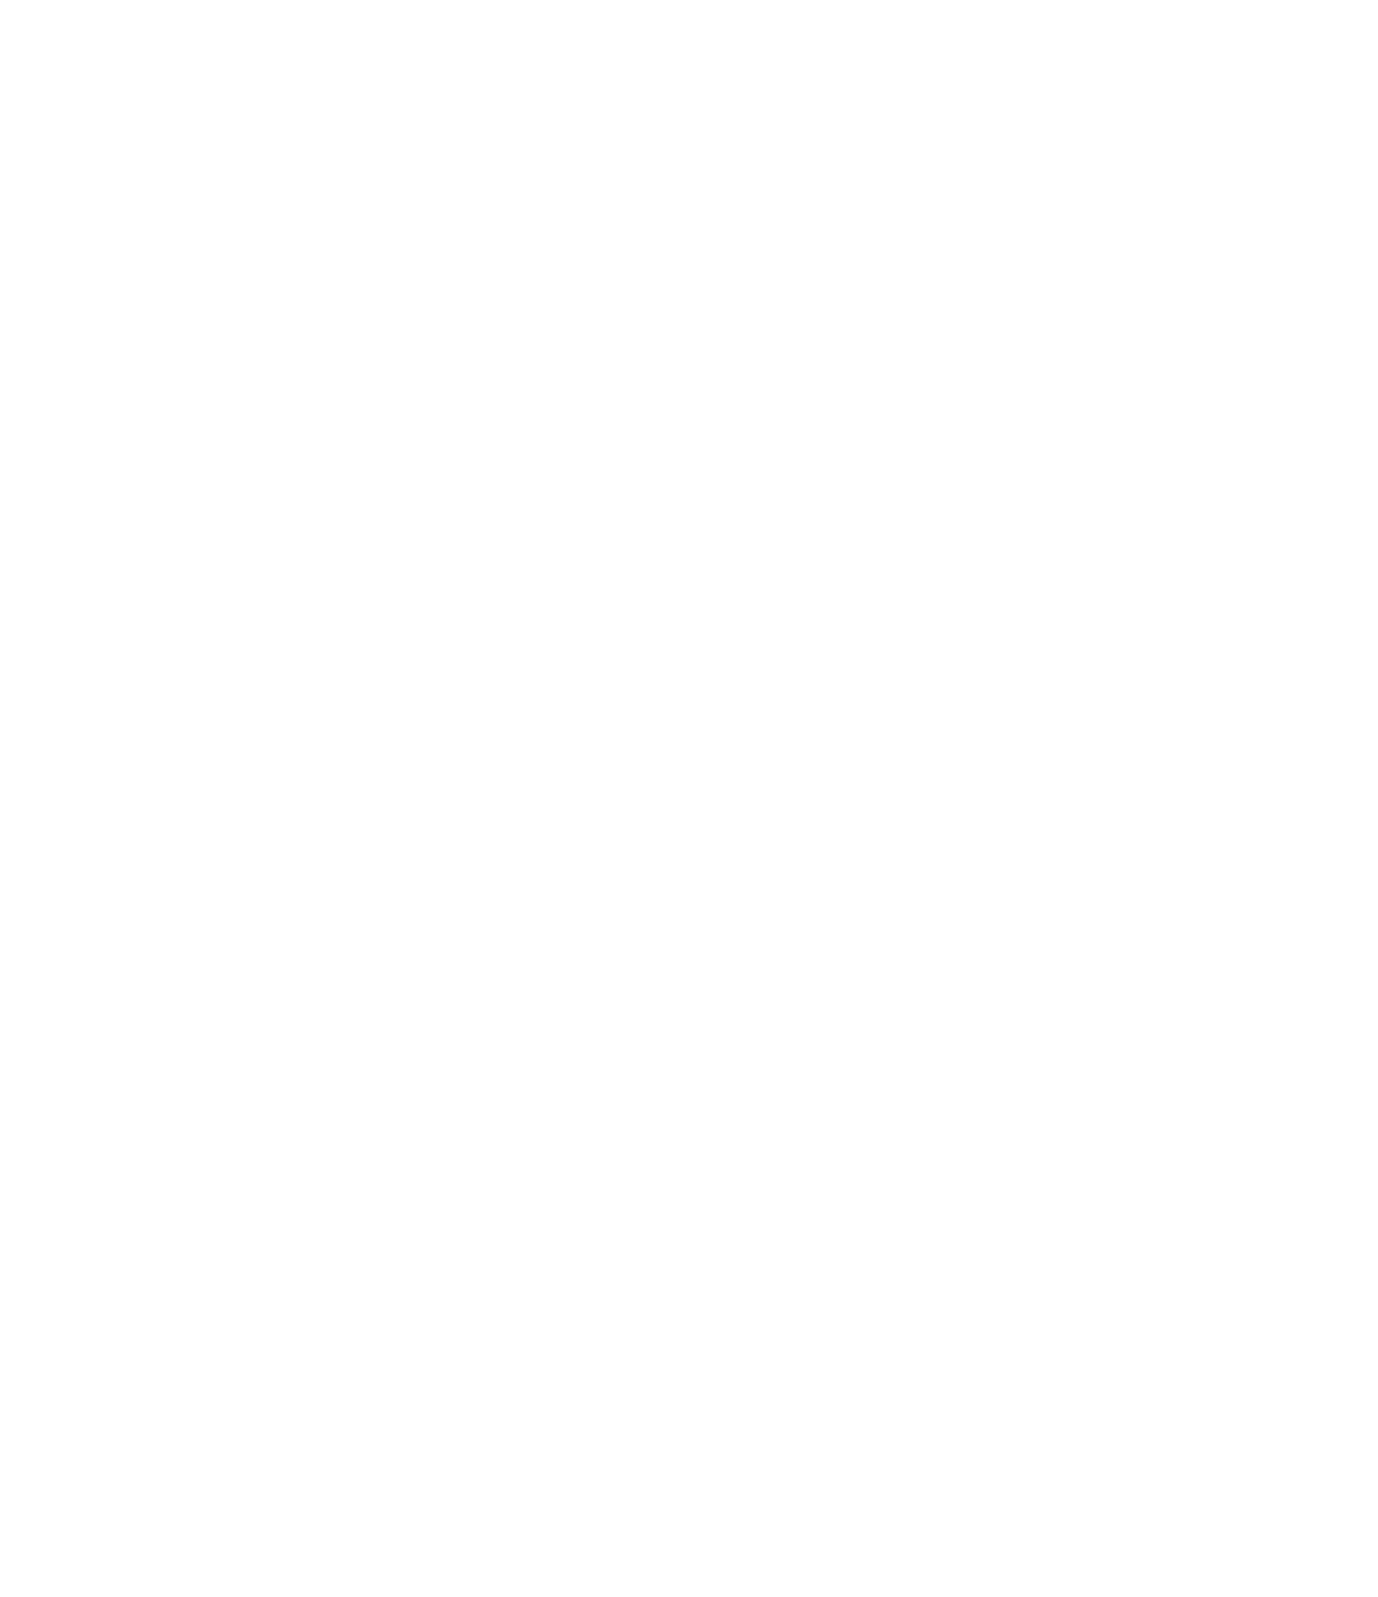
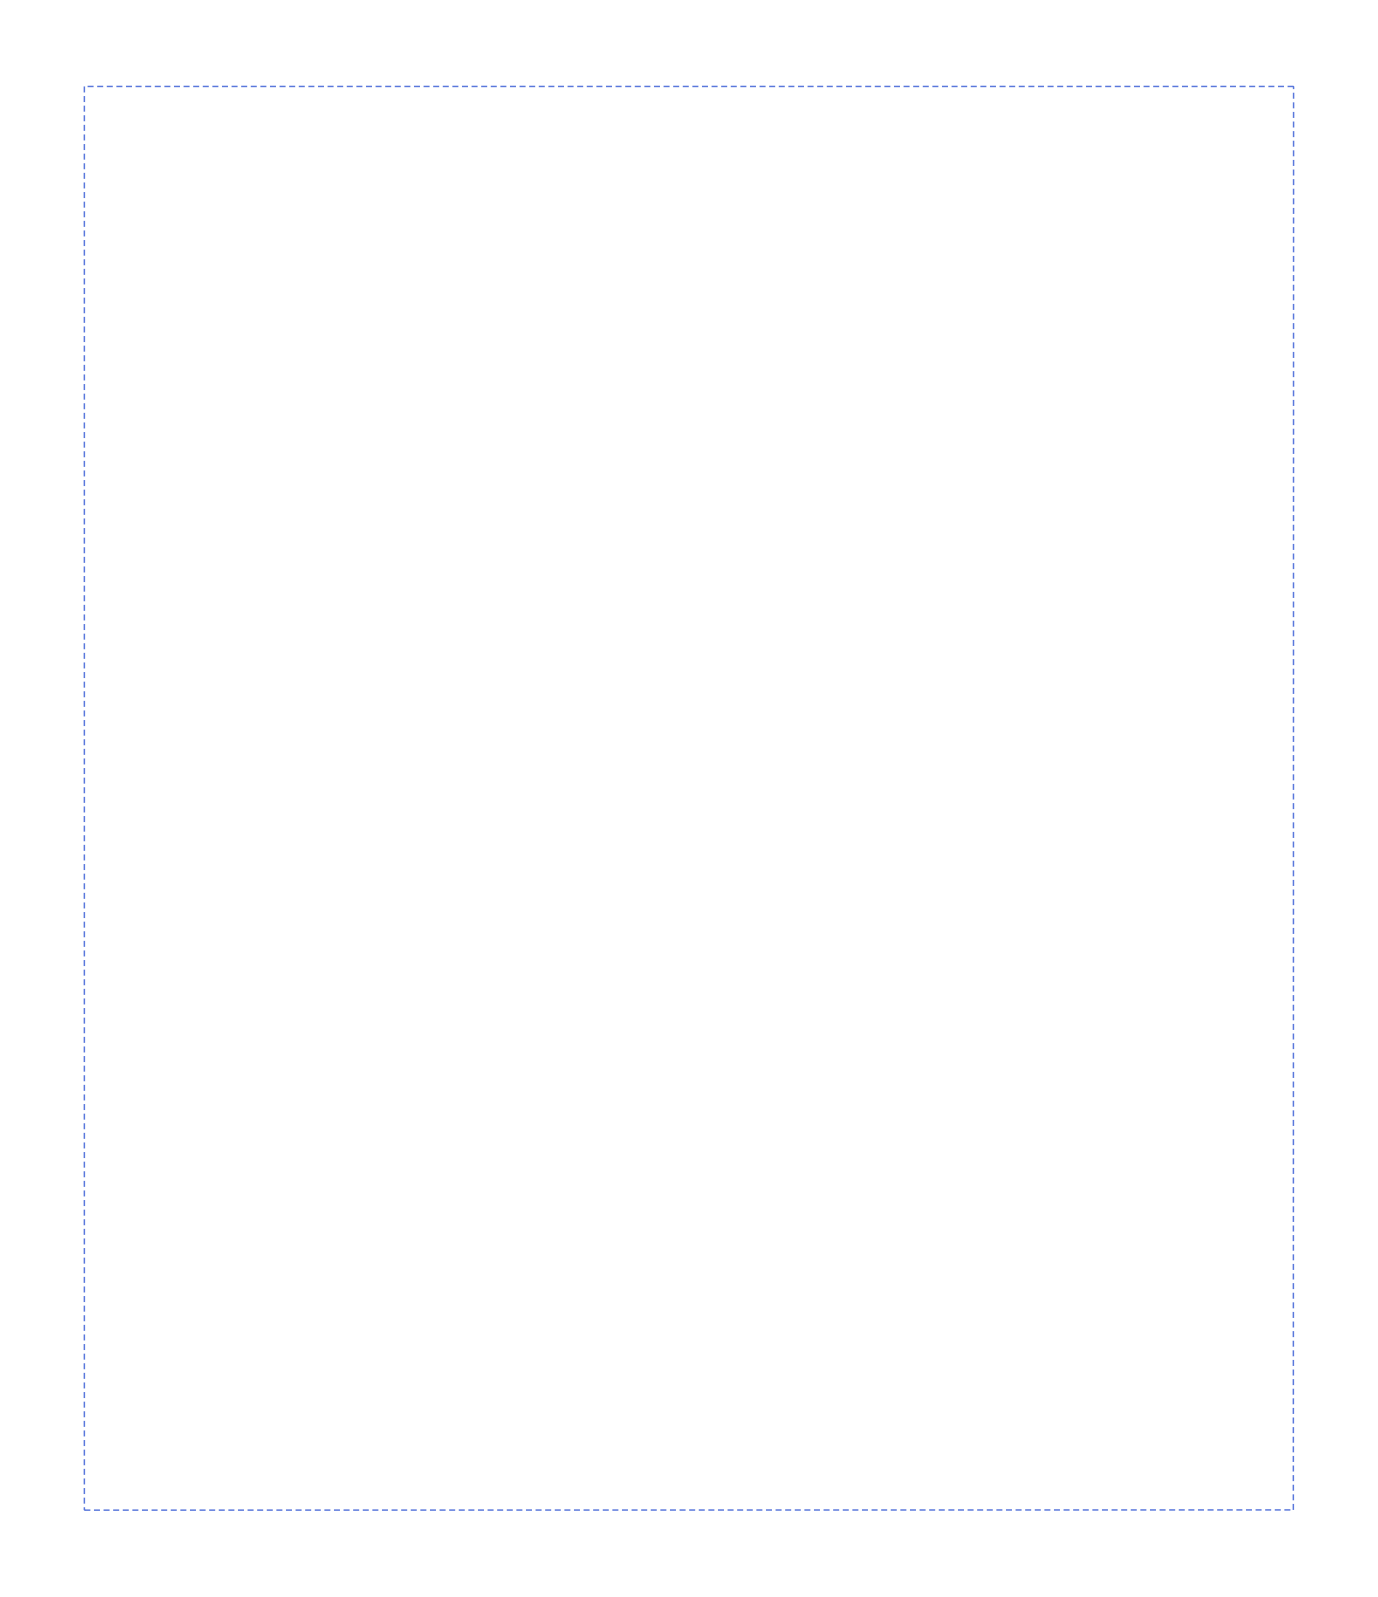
zone outline: none -> (1293, 86) (84, 86) (84, 1510) (1293, 1509) (1293, 86)

